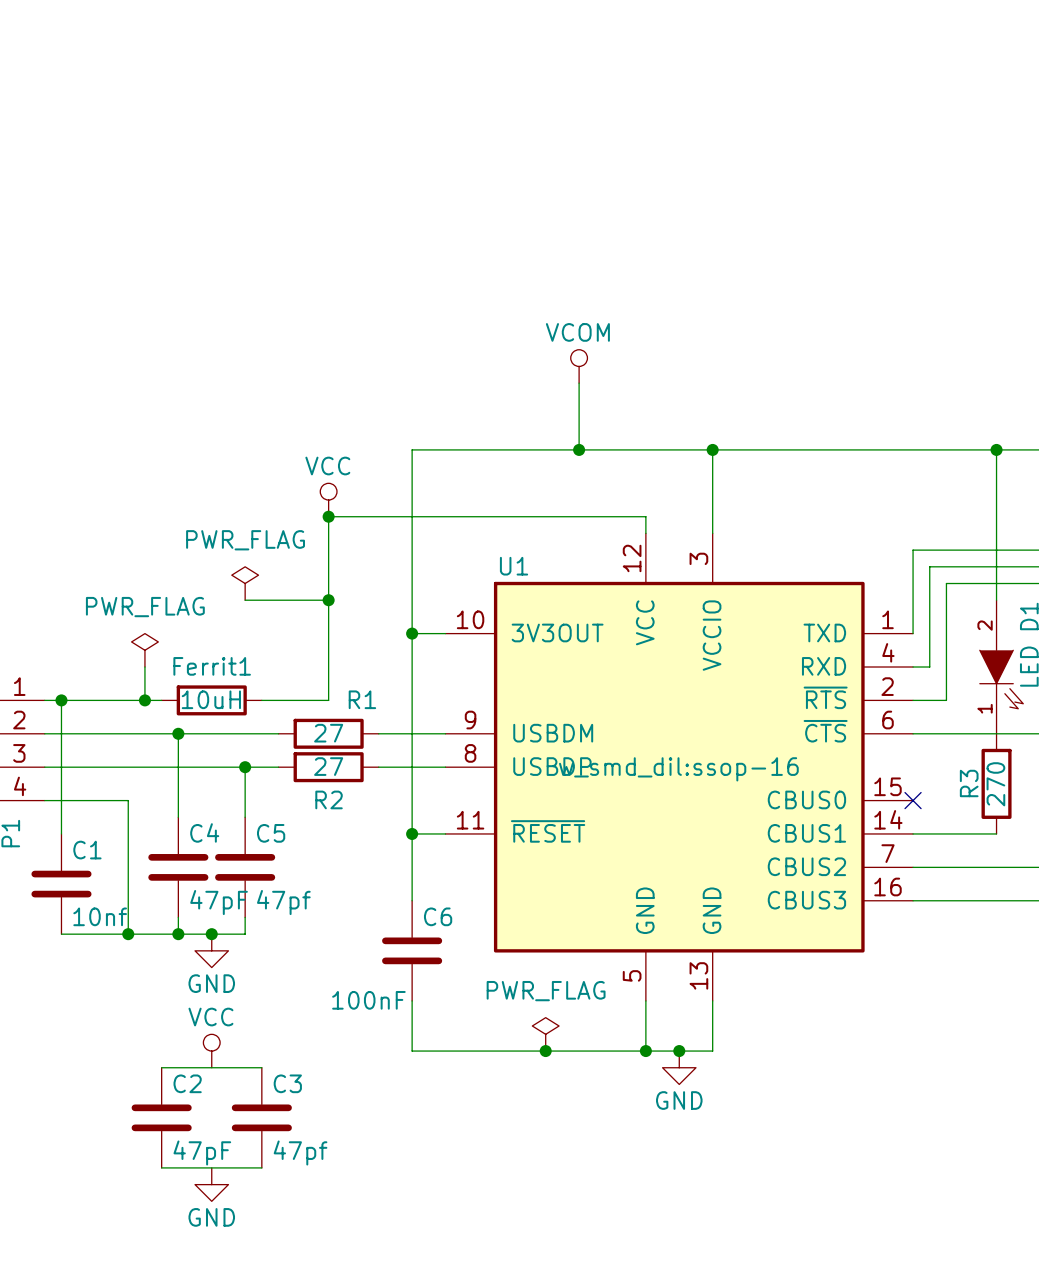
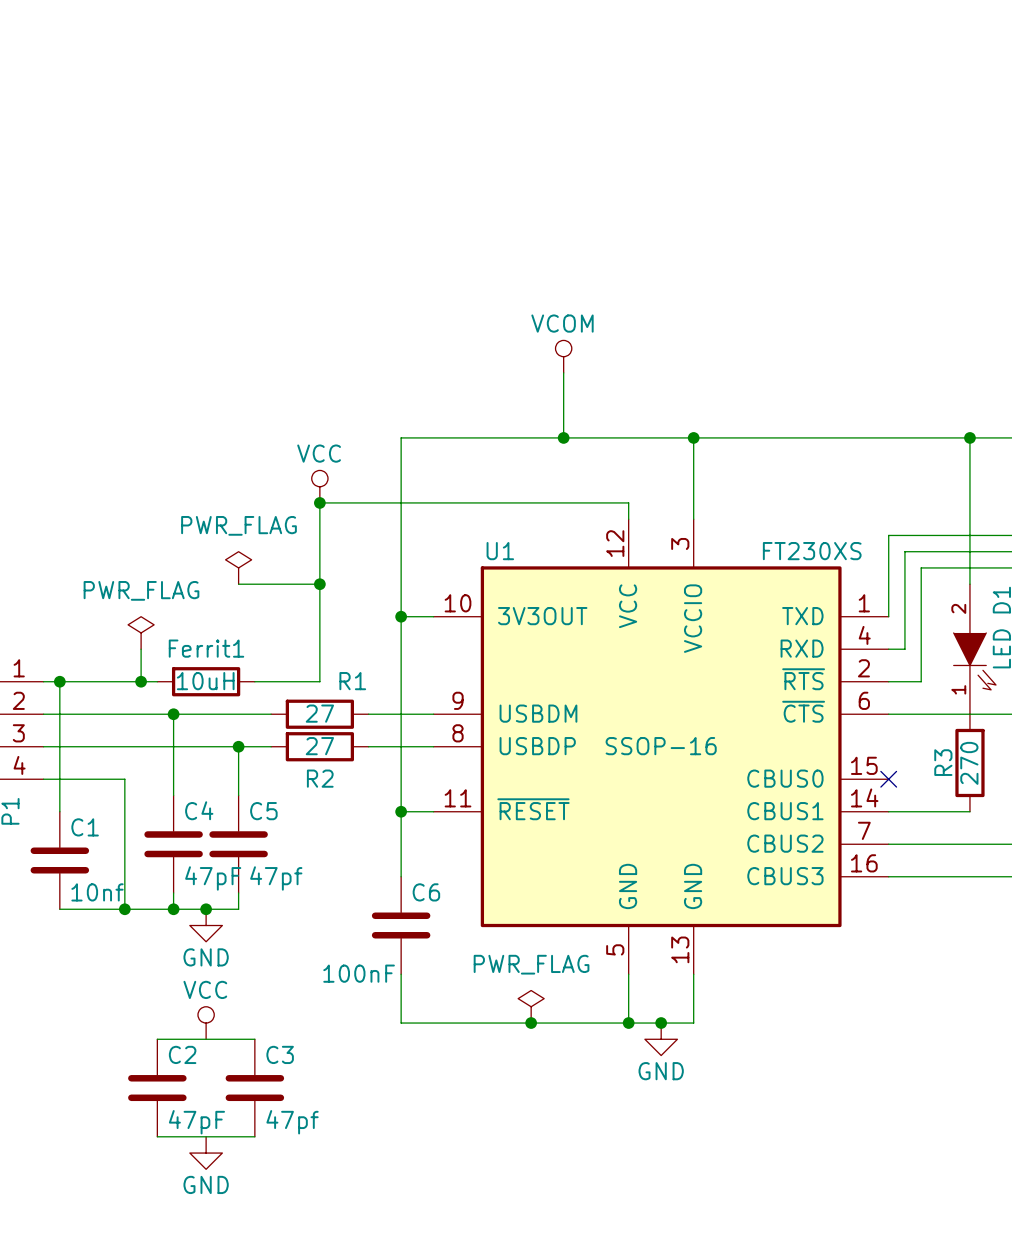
U1 value: none -> FT230XS (812, 551)
U1 text: w_smd_dil:ssop-16 (678, 769) -> SSOP-16 (661, 746)

